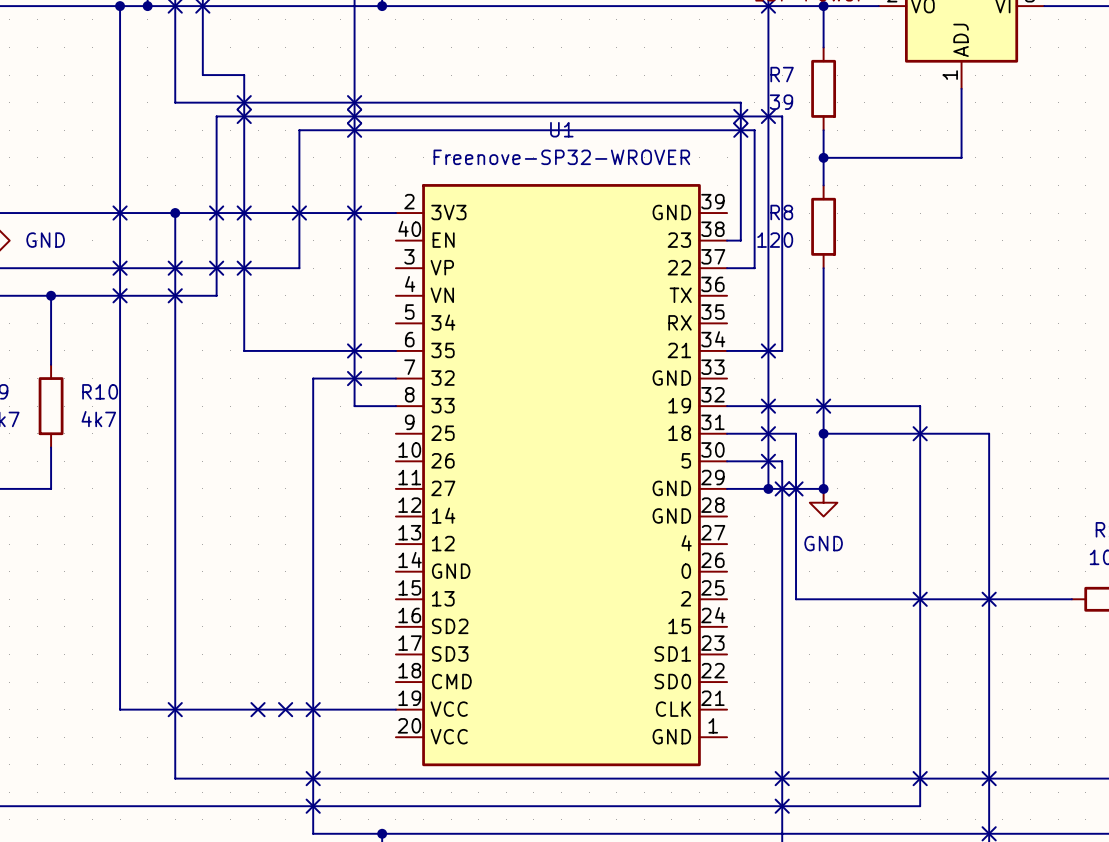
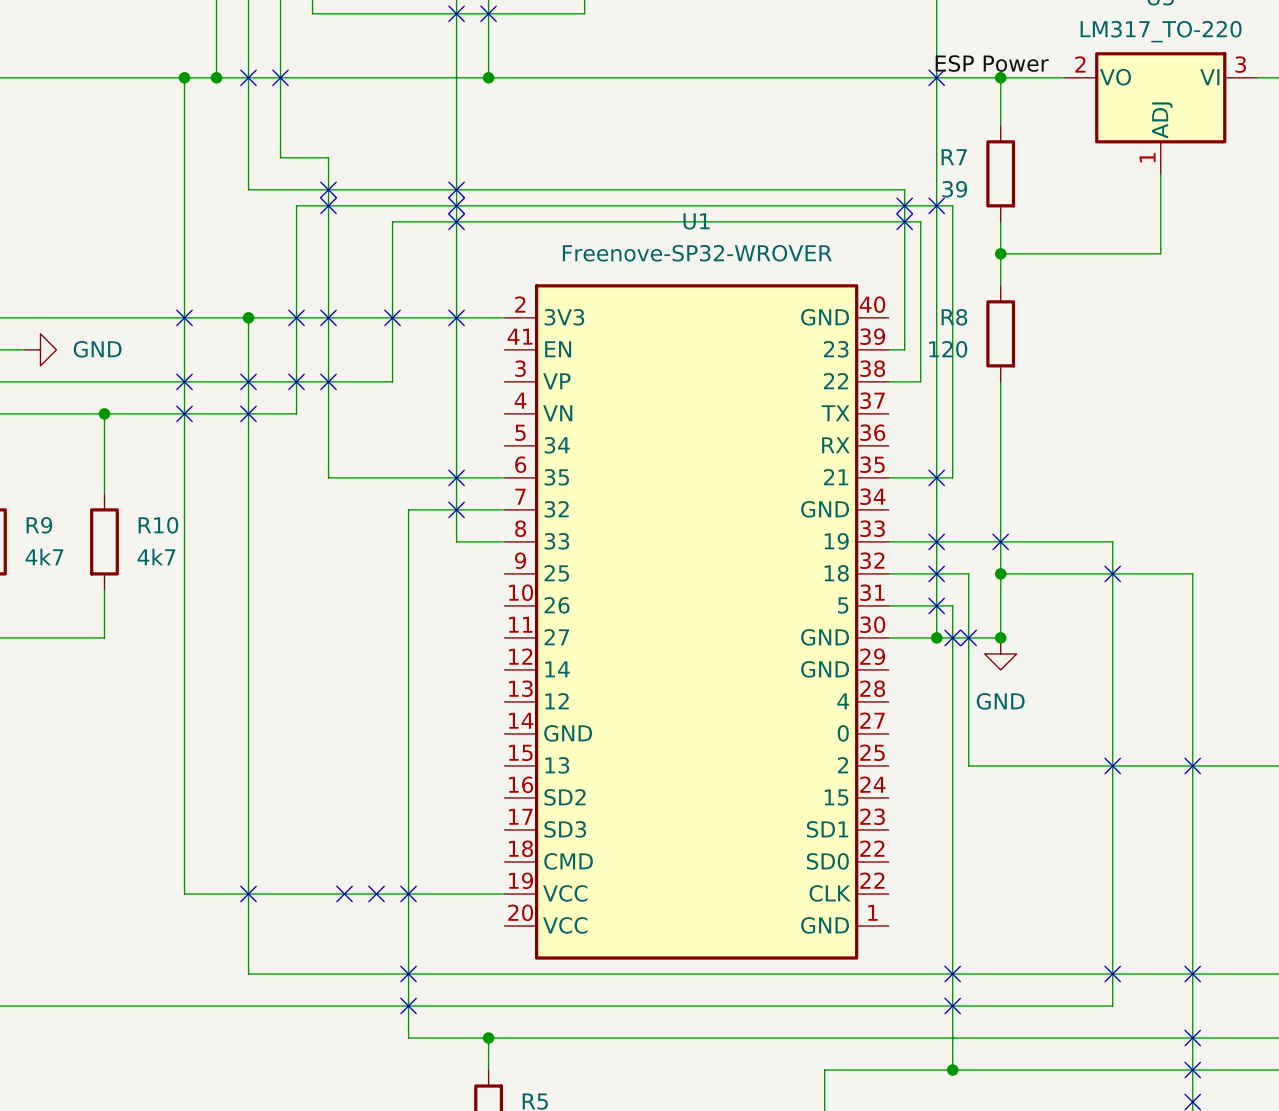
U1 symbol: [395, 184, 728, 767] -> [504, 284, 889, 960]

